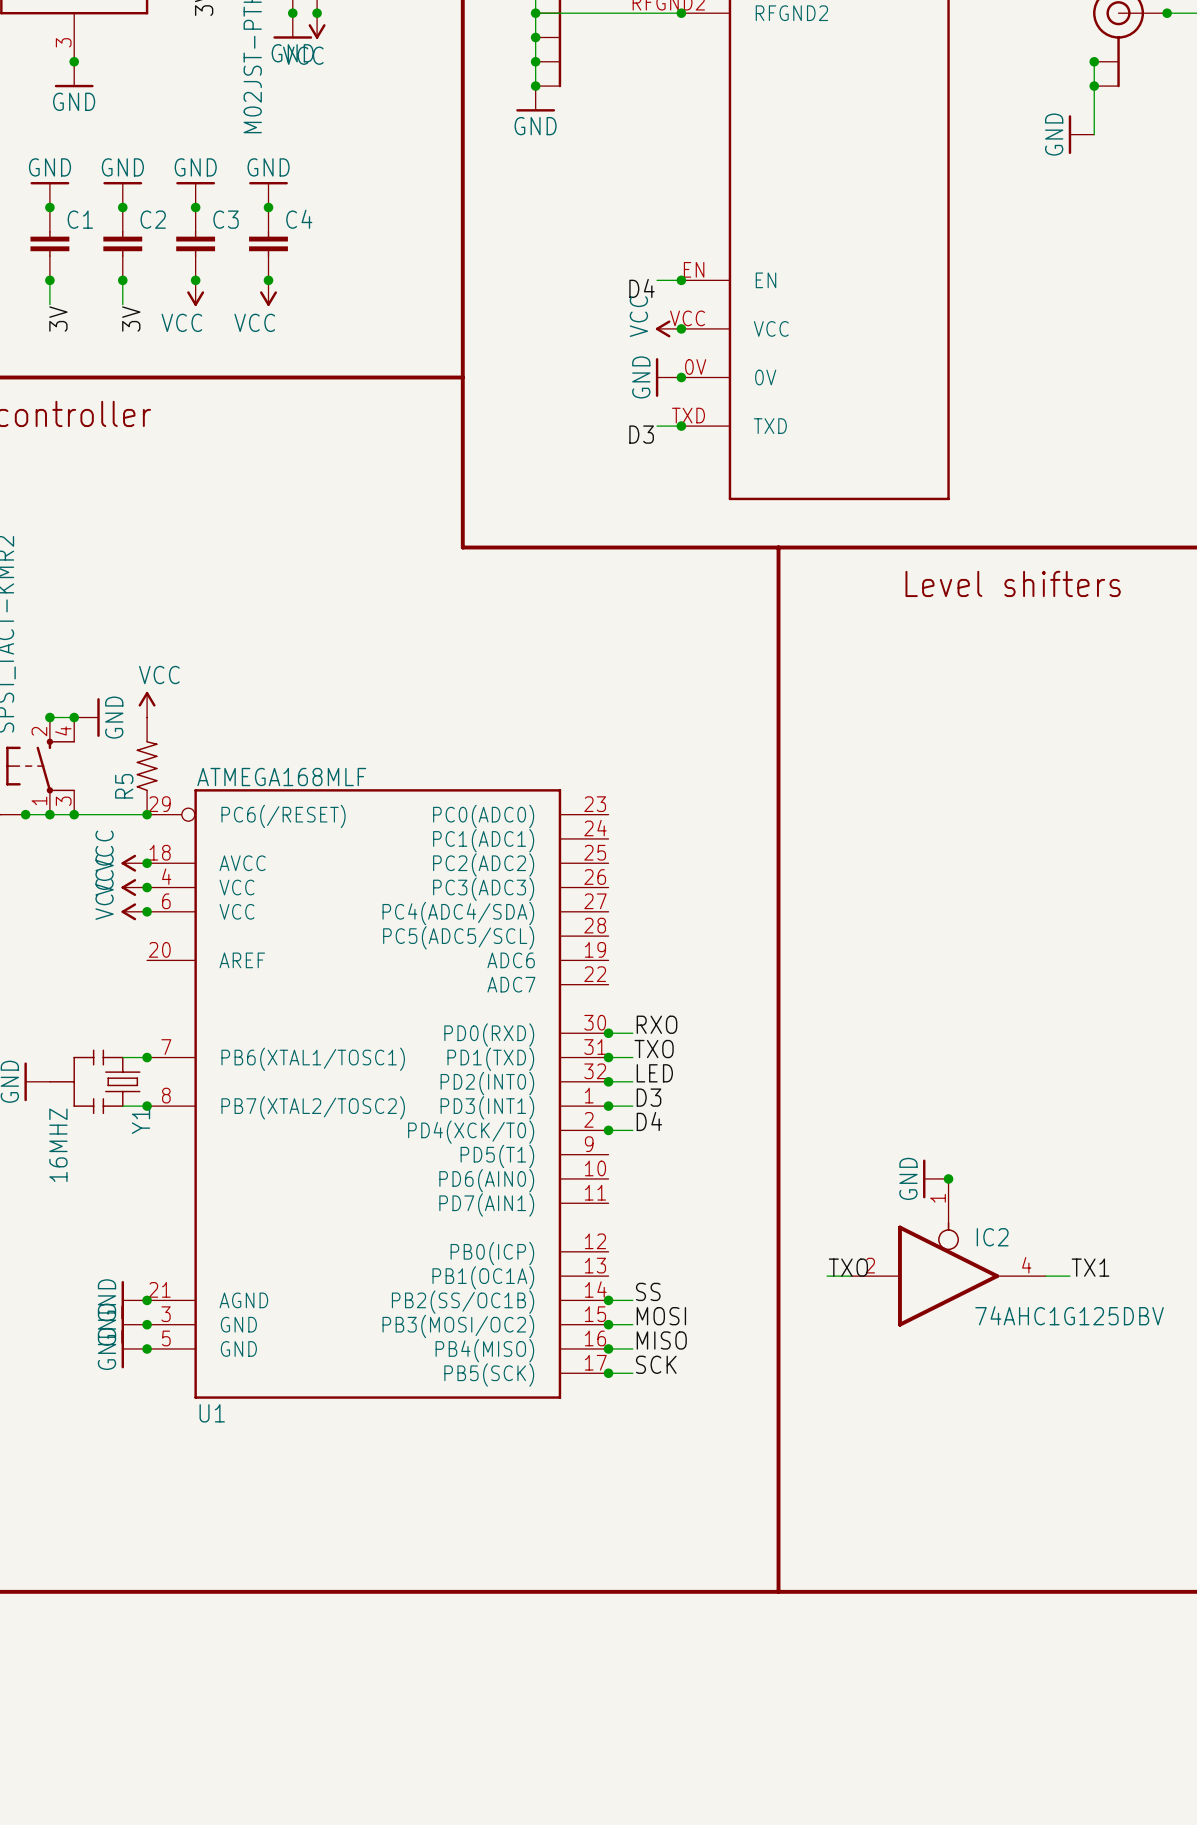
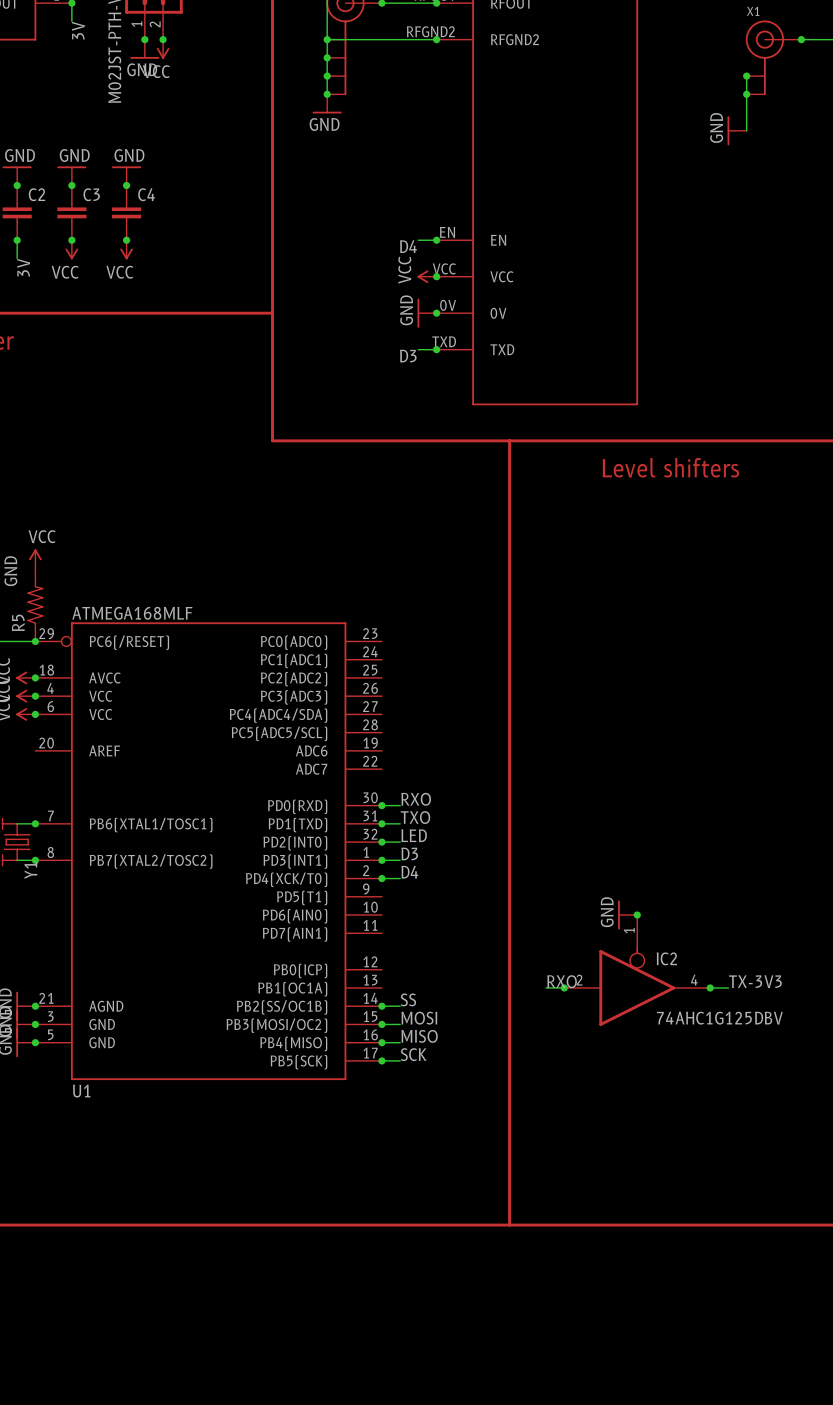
label: TXO (848, 1267) -> RXO (562, 981)
label: TX1 (1090, 1267) -> TX-3V3 (755, 981)
junction: none -> (564, 987)
junction: none -> (710, 987)

